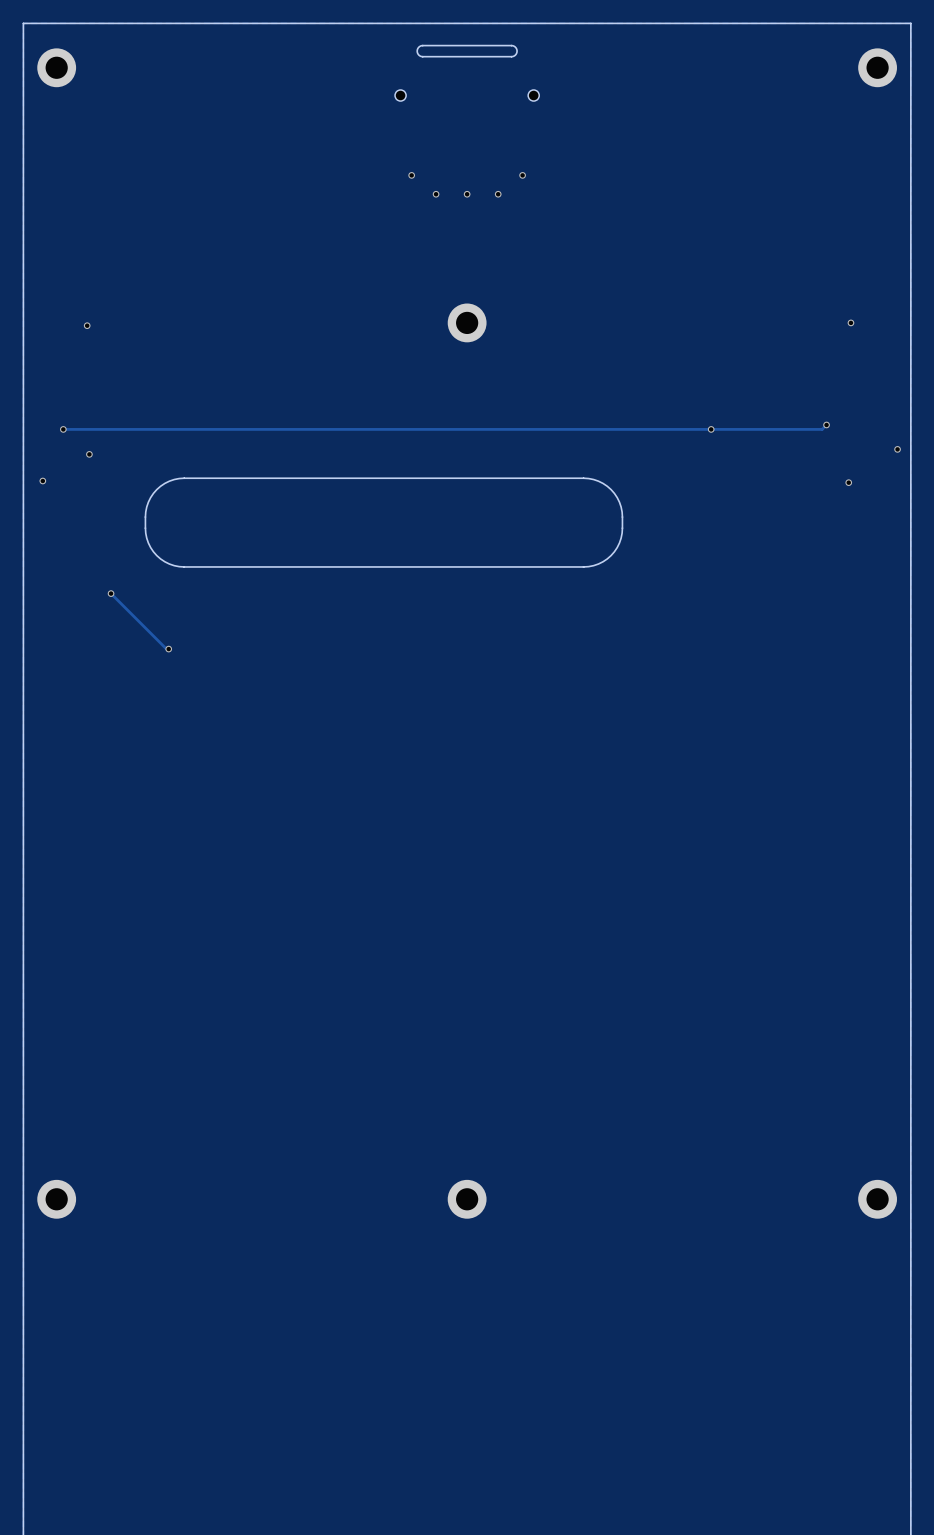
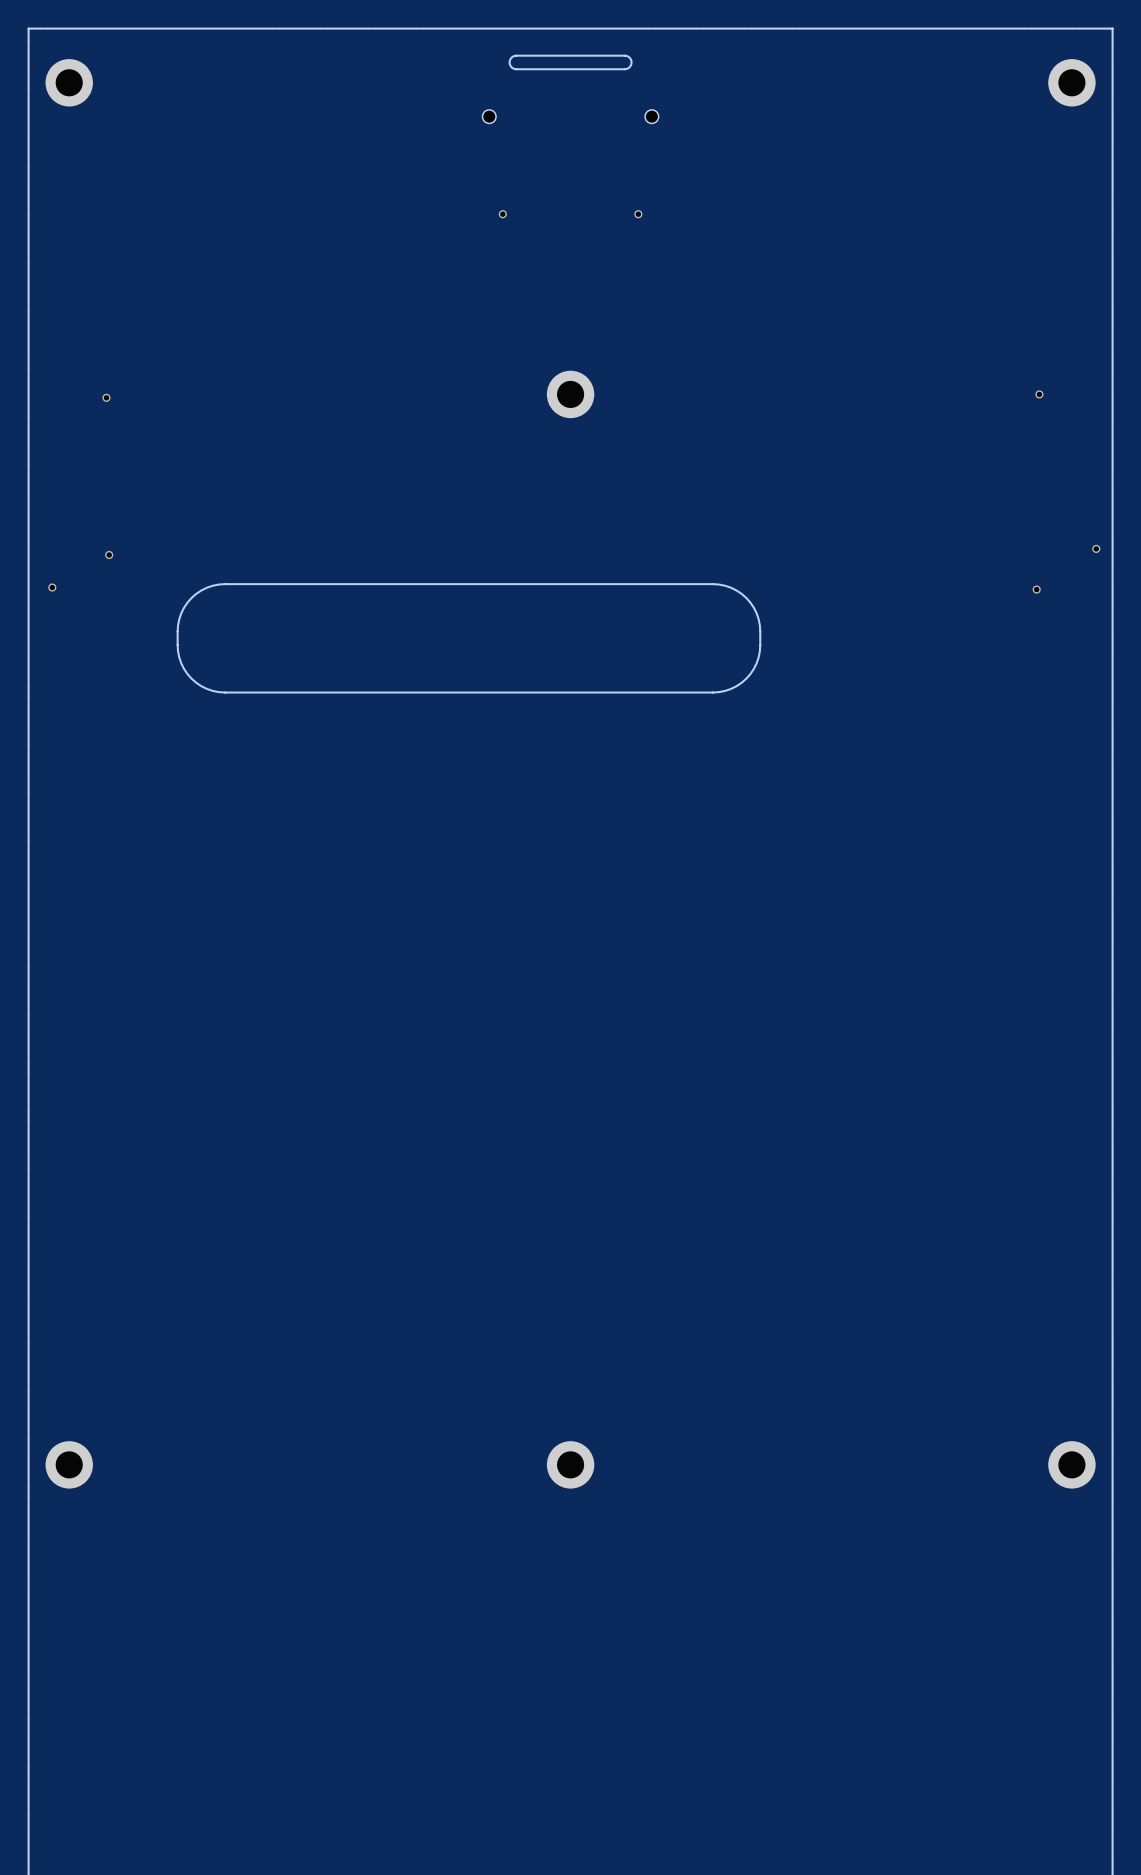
via: (436, 194) -> none
via: (467, 194) -> none
via: (498, 194) -> none
track: (826, 424) (822, 429) (63, 429) -> none
via: (826, 424) -> none
via: (63, 429) -> none
via: (711, 429) -> none
track: (111, 593) (166, 649) (168, 649) -> none
via: (111, 593) -> none
via: (168, 649) -> none

